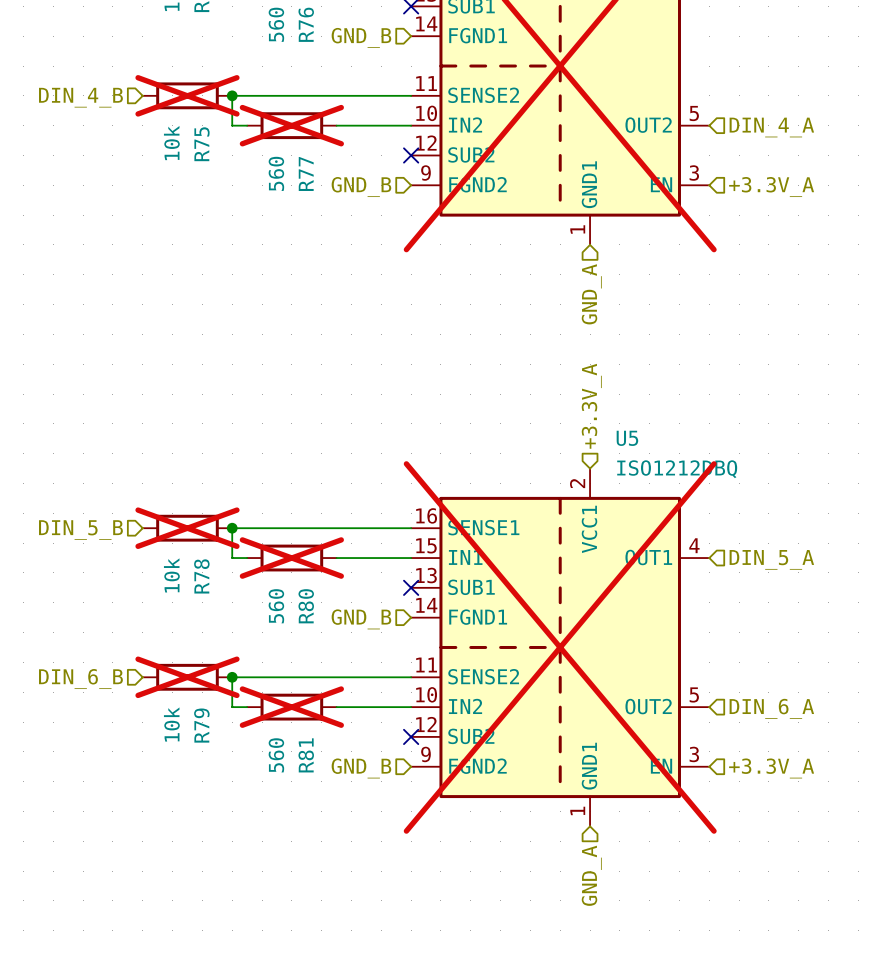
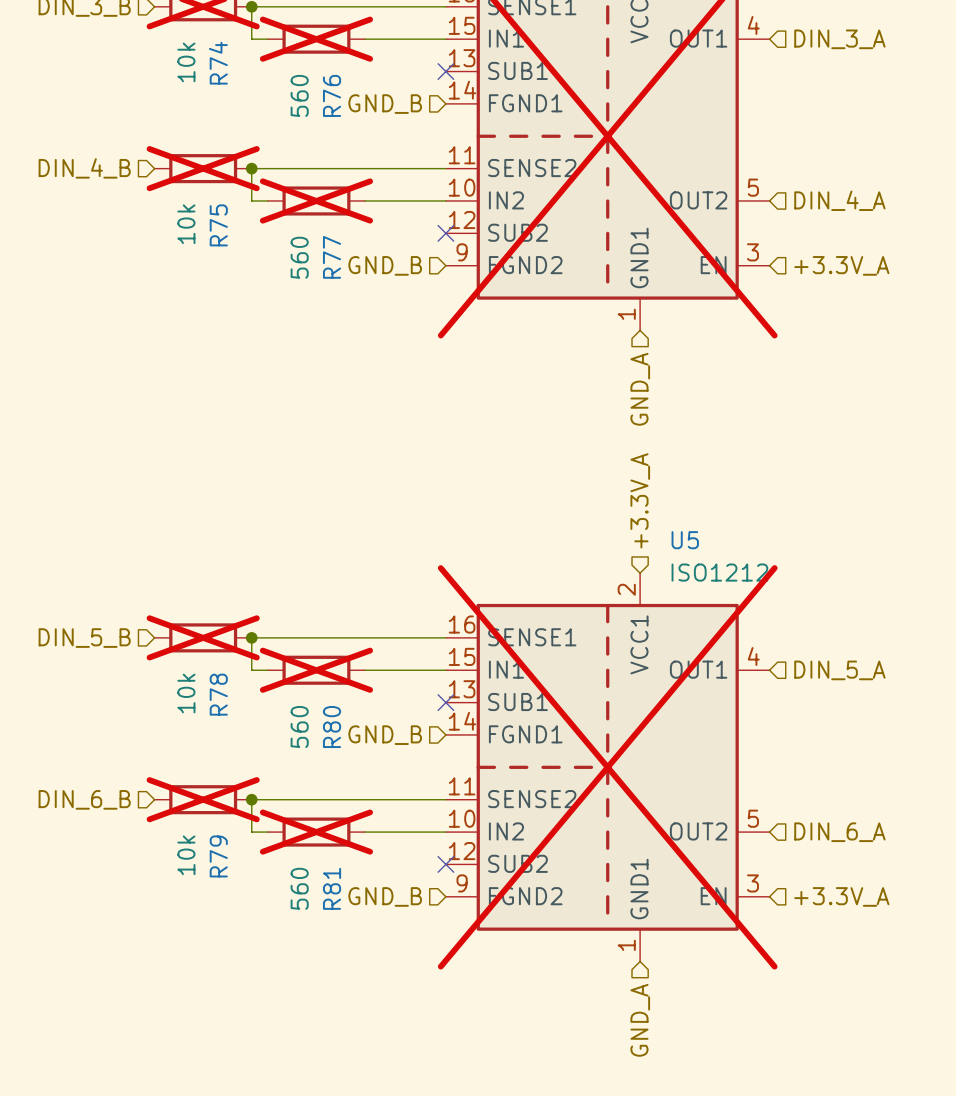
U5 value: ISO1212DBQ (677, 469) -> ISO1212 (719, 572)

